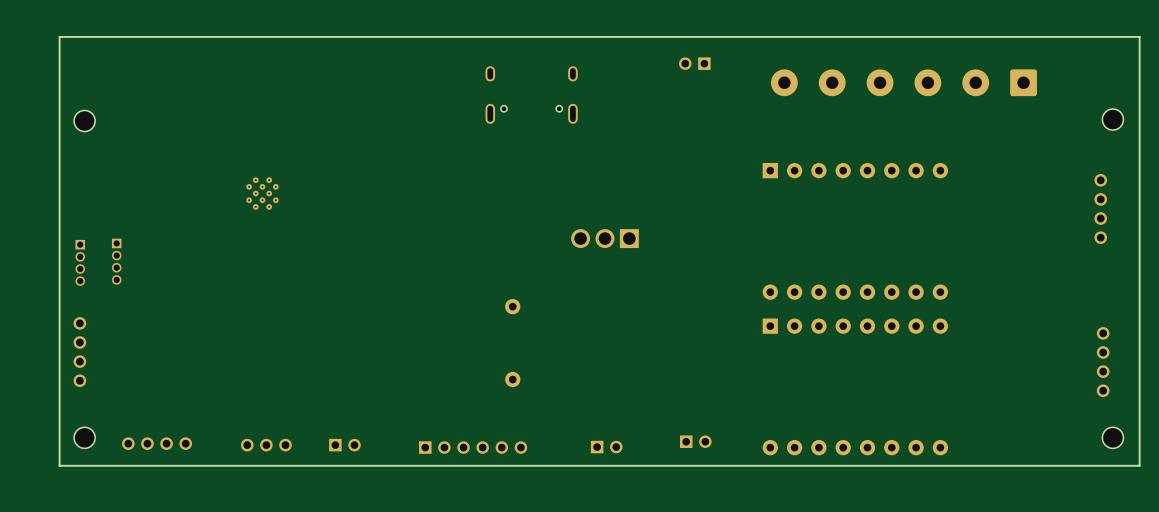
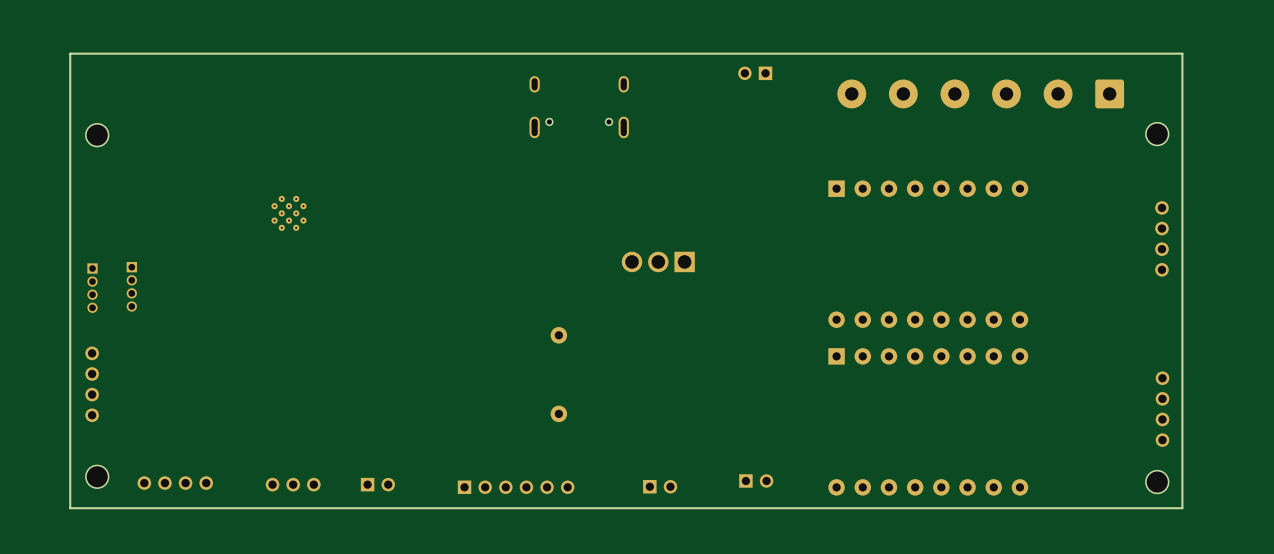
board edge: (59, 45) (59, 36) (1139, 36) (1139, 465) (59, 465) -> (70, 53) (1182, 53) (1182, 508) (70, 506)
part position: (1112, 119) -> (1157, 134)
part position: (1100, 208) -> (1161, 238)
part position: (1103, 362) -> (1162, 409)
part position: (1112, 437) -> (1157, 482)

